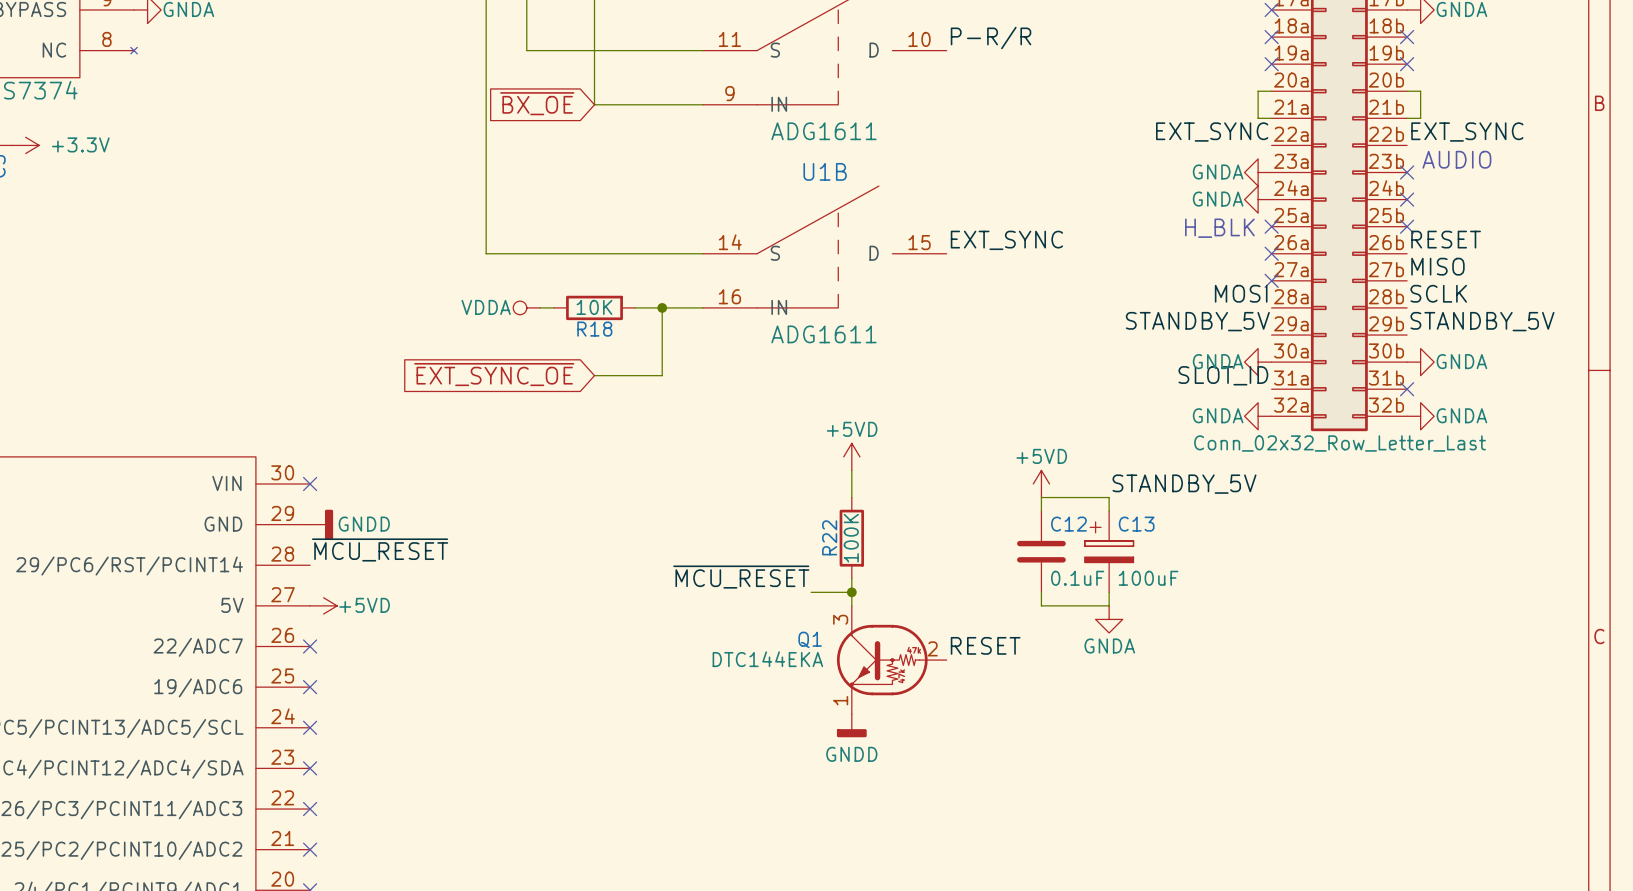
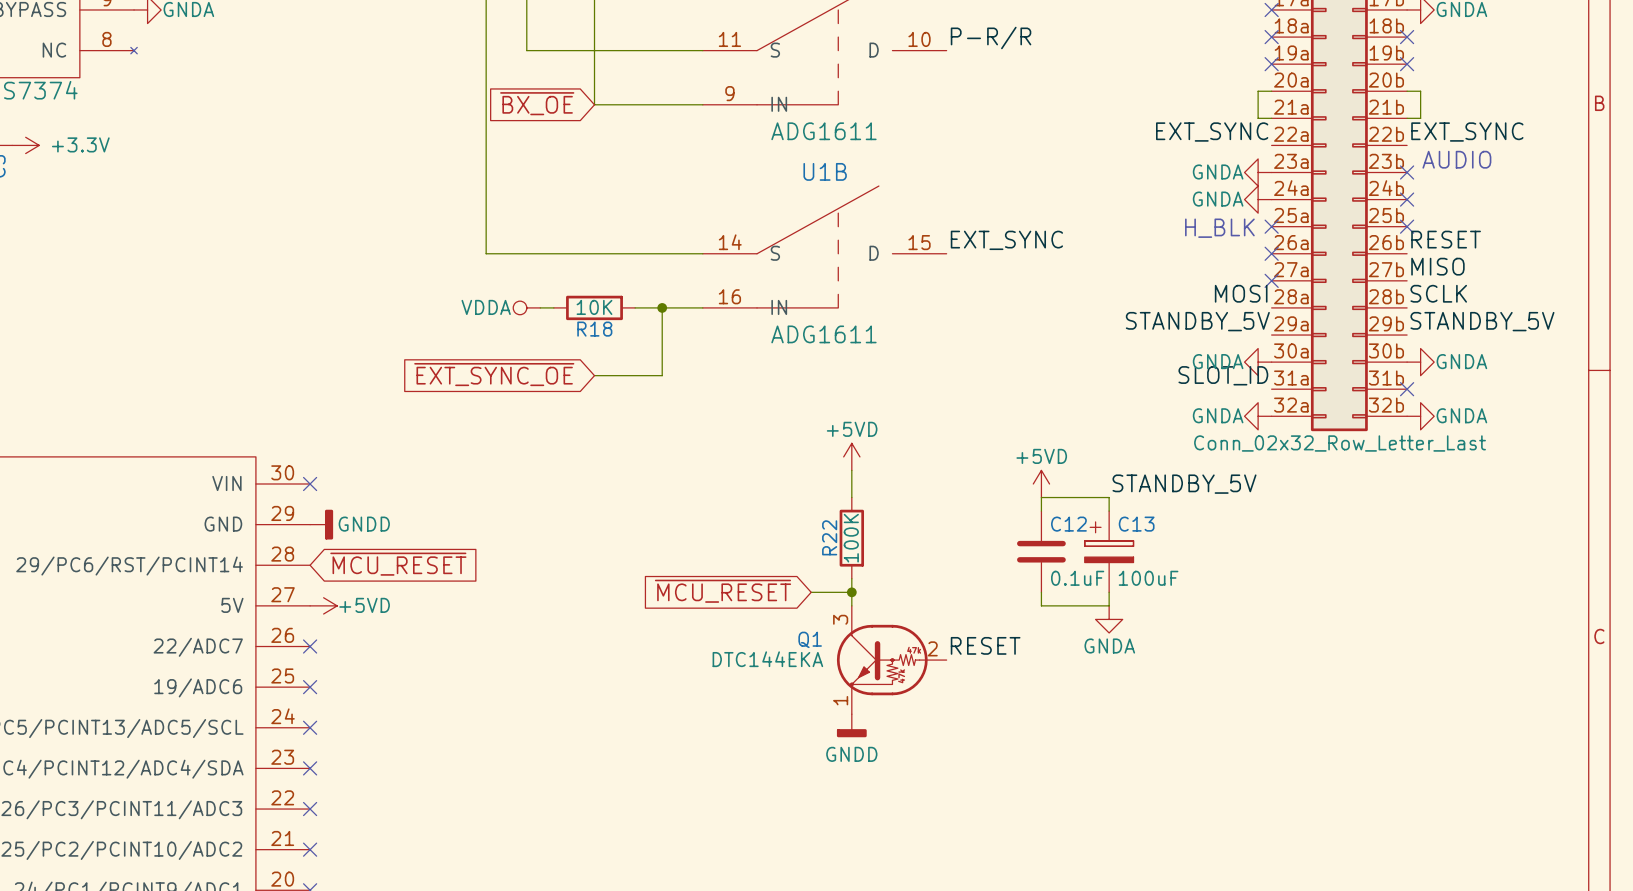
label: ~{MCU_RESET} (380, 549) -> none
global label: none -> ~{MCU_RESET} (398, 564)
label: ~{MCU_RESET} (741, 577) -> none
global label: none -> ~{MCU_RESET} (723, 591)

